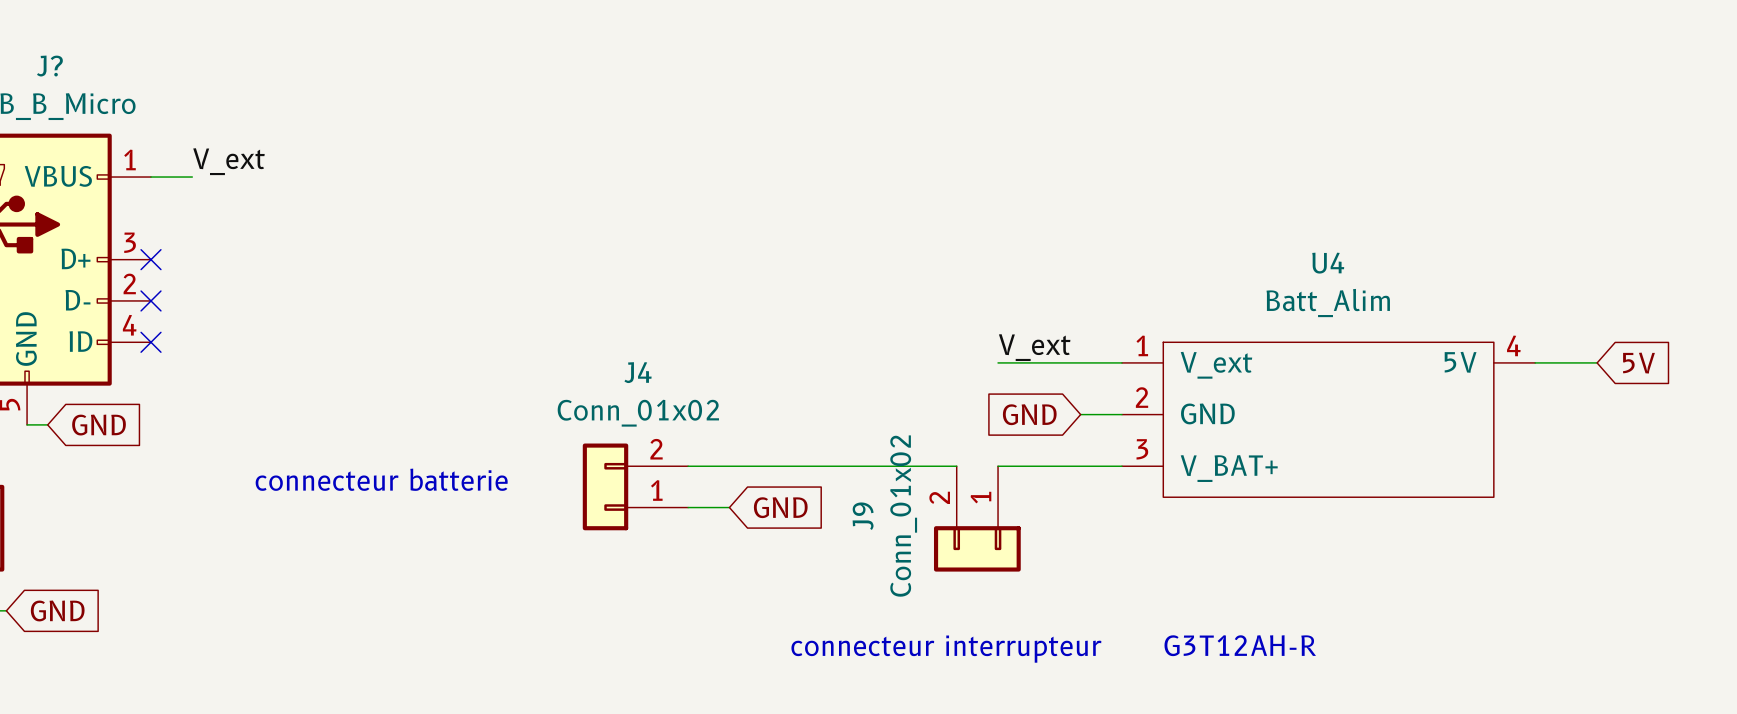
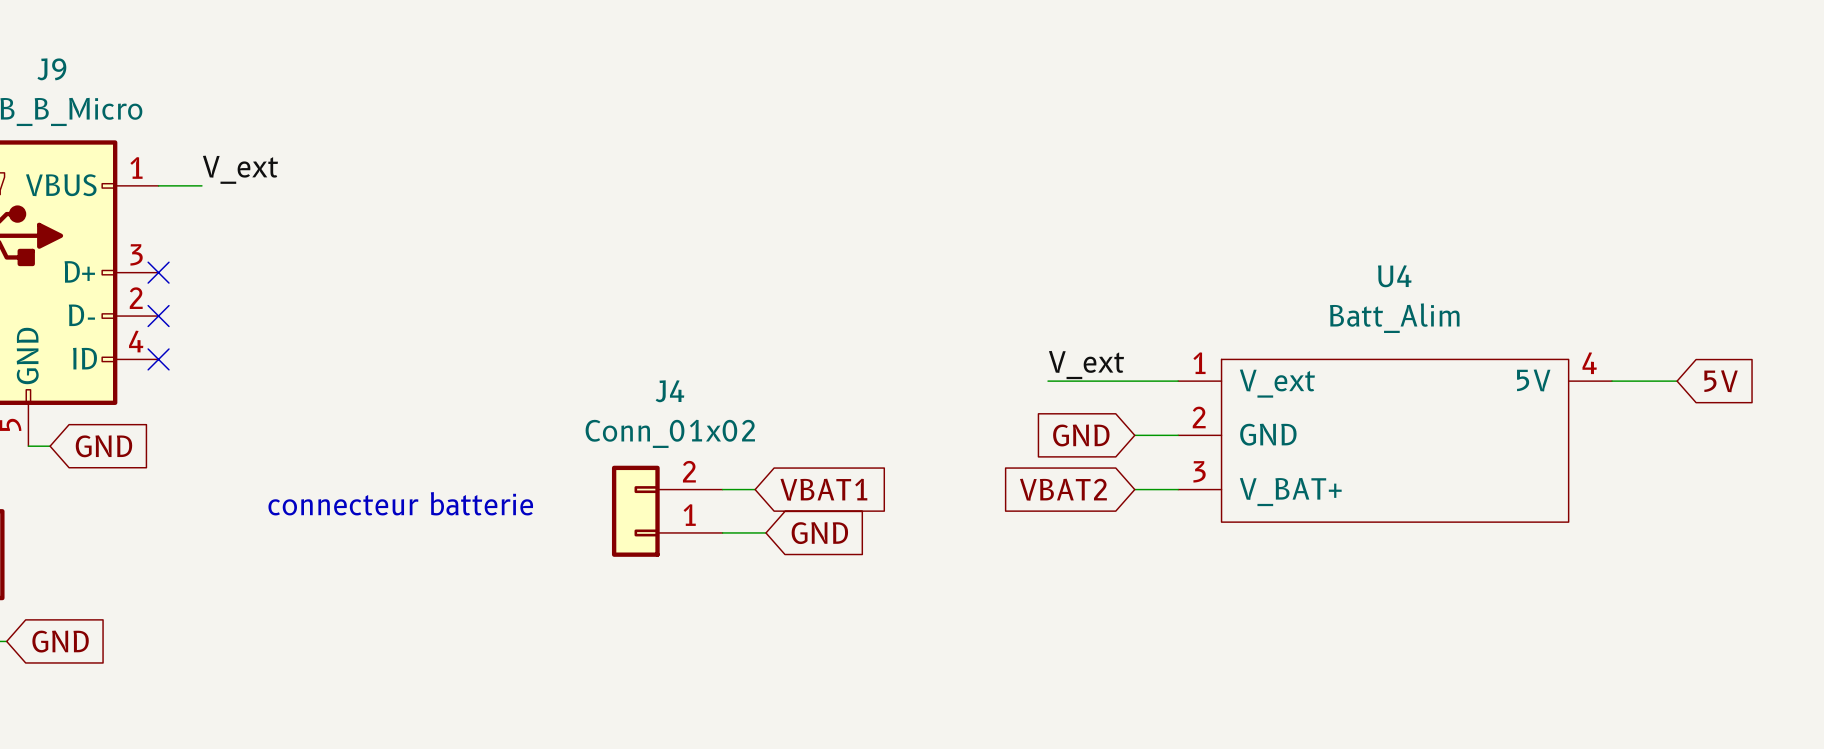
J? name: J? (49, 66) -> J9 (51, 69)
wire: (719, 466) (956, 466) -> none
global label: none -> VBAT1 (823, 489)
wire: (998, 466) (1080, 466) -> none
global label: none -> VBAT2 (1063, 489)
J9: Conn_01x02 (977, 518) -> none
text: G3T12AH-R (1240, 645) -> none
text: connecteur interrupteur (946, 649) -> none

